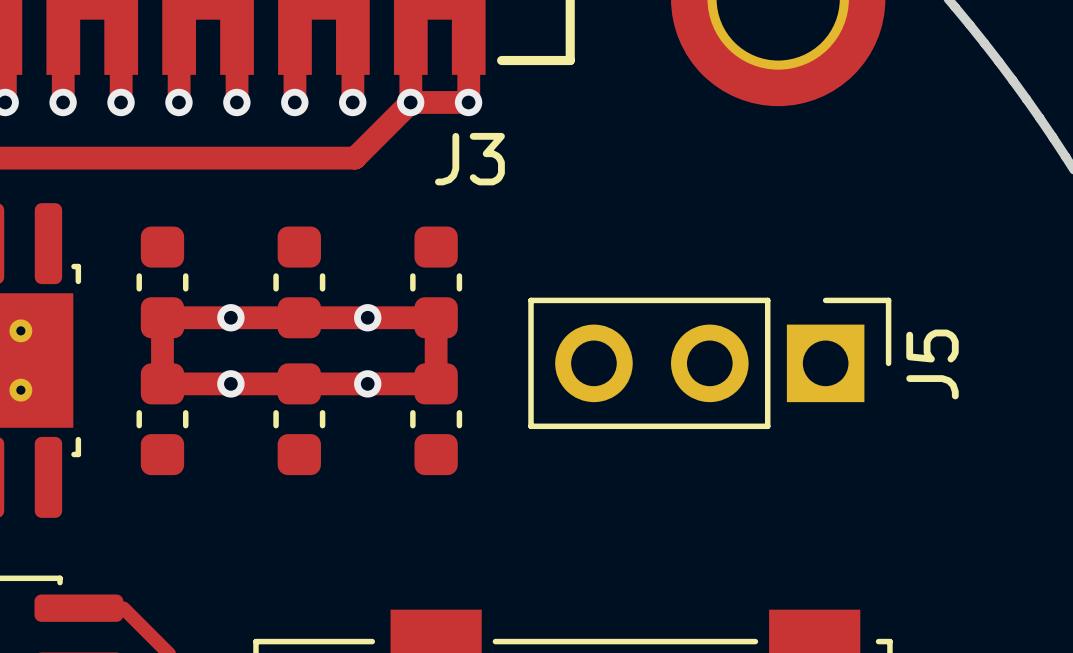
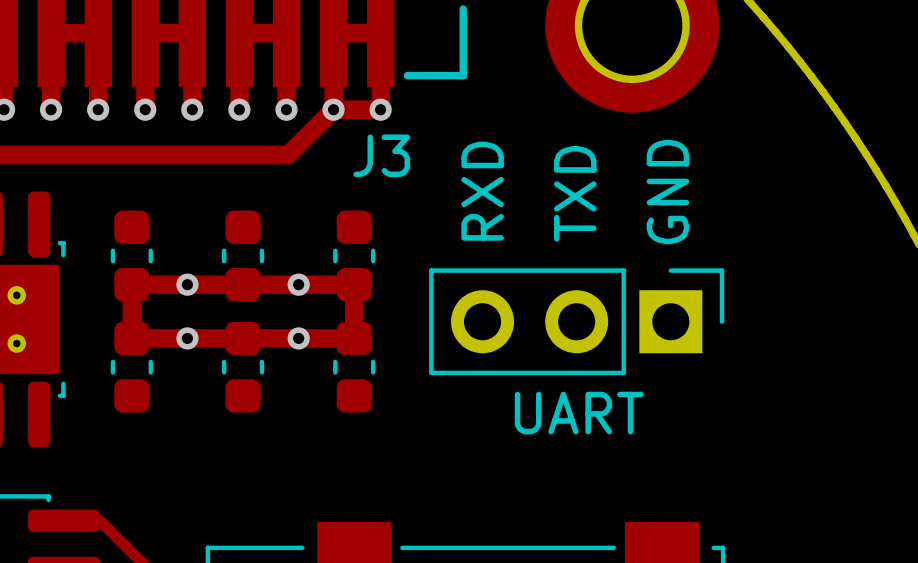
text: none -> RXD (482, 191)
text: none -> GND (667, 192)
text: none -> TXD (575, 193)
J5 name: J5 (932, 364) -> none
text: none -> UART (579, 413)

